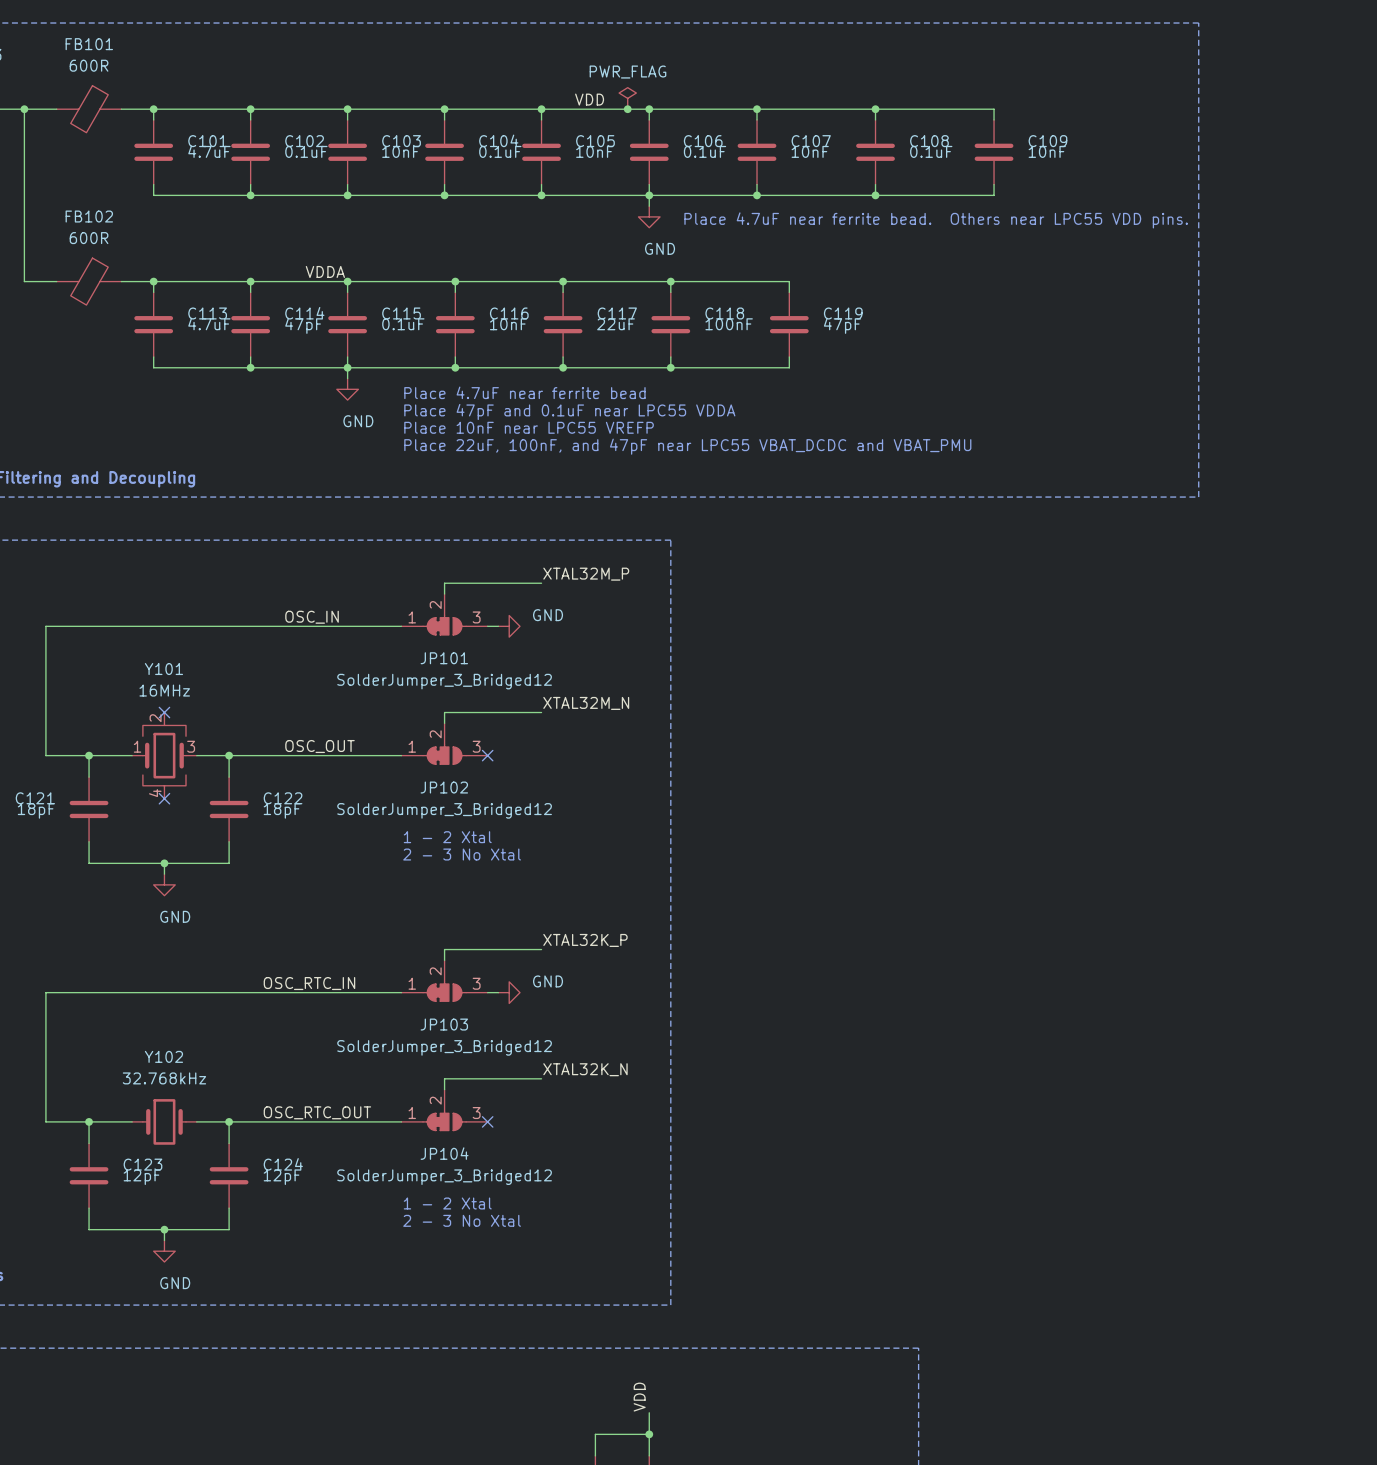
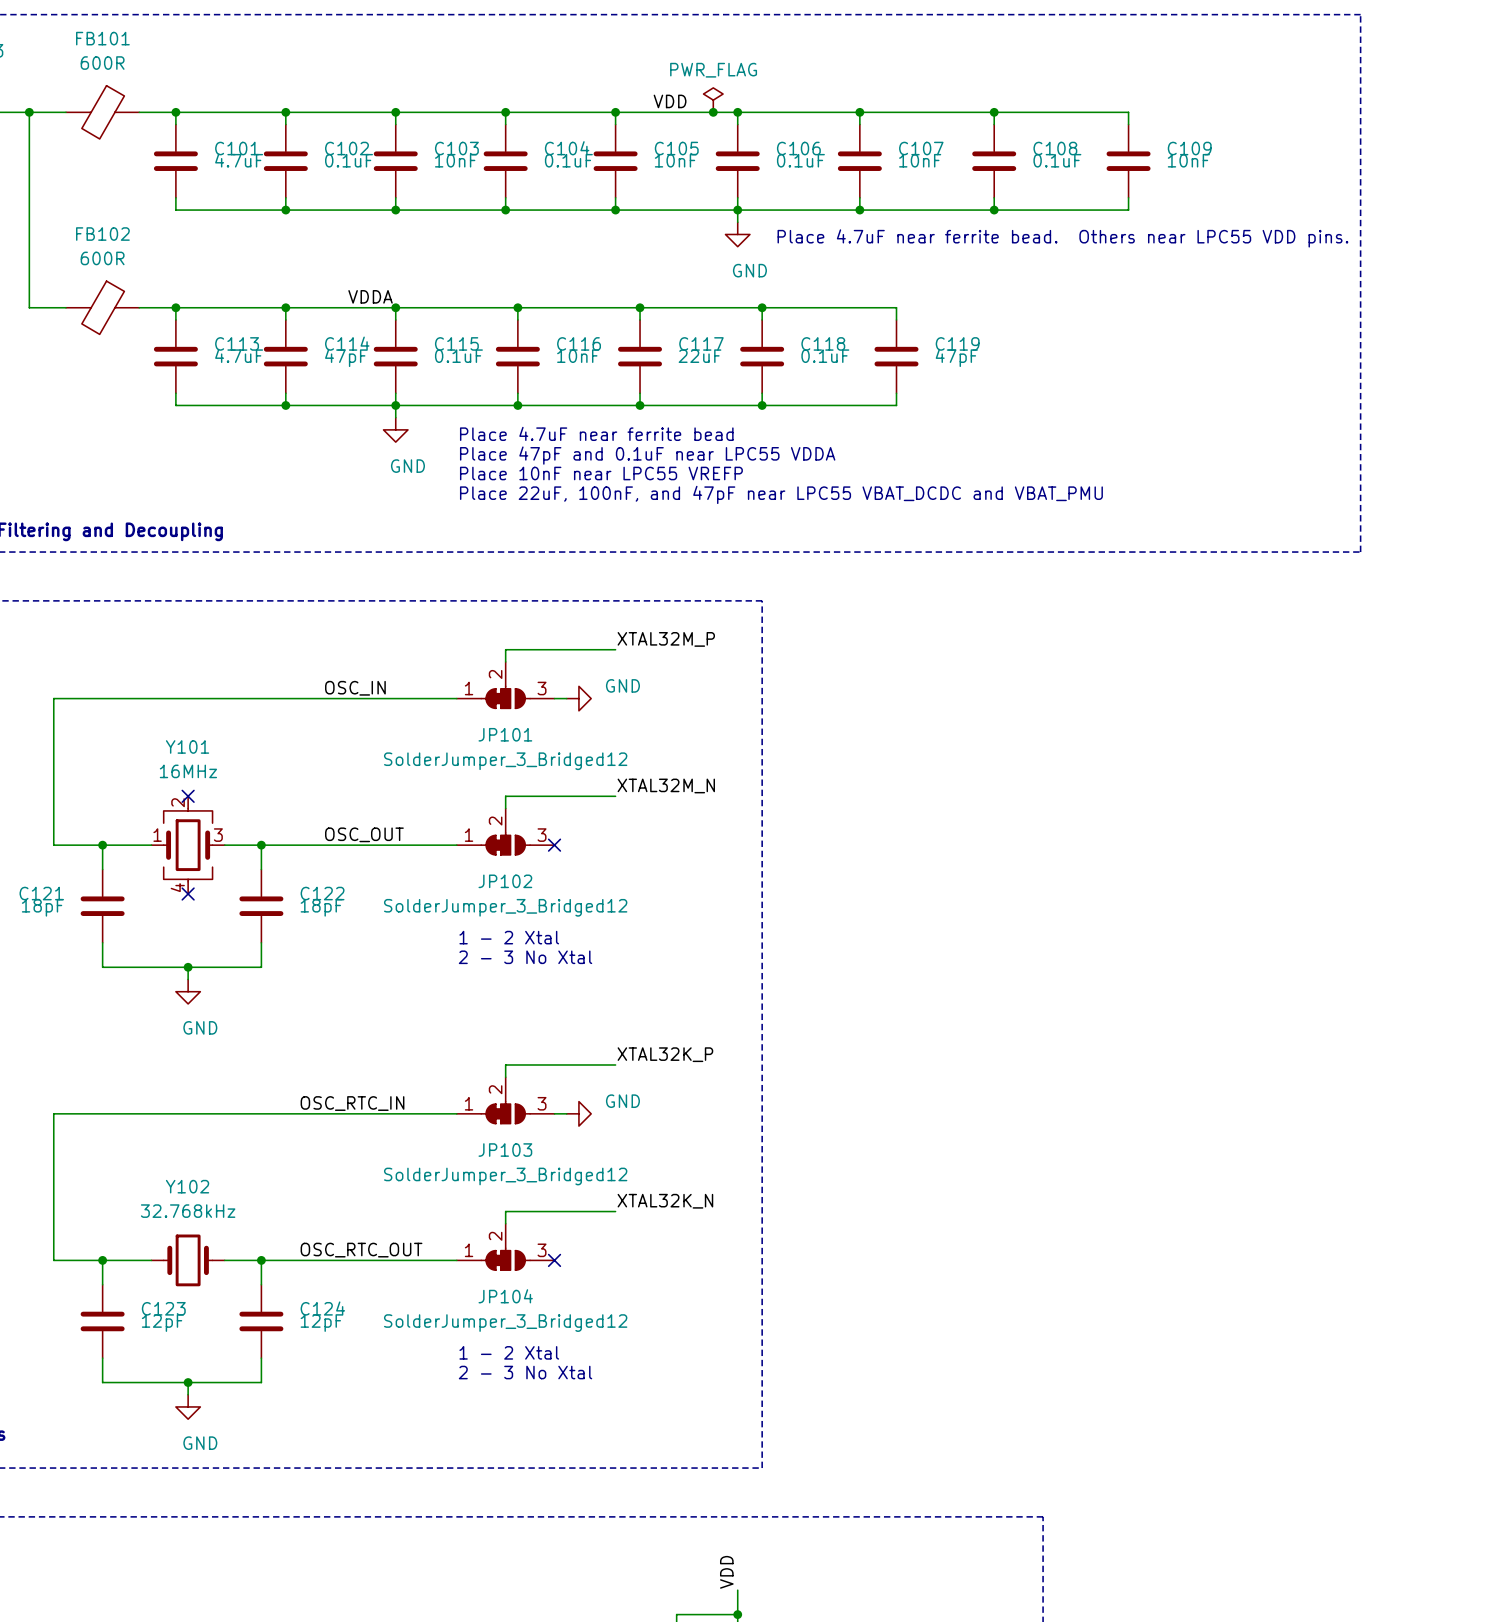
C118 value: 100nF (729, 324) -> 0.1uF (825, 356)

